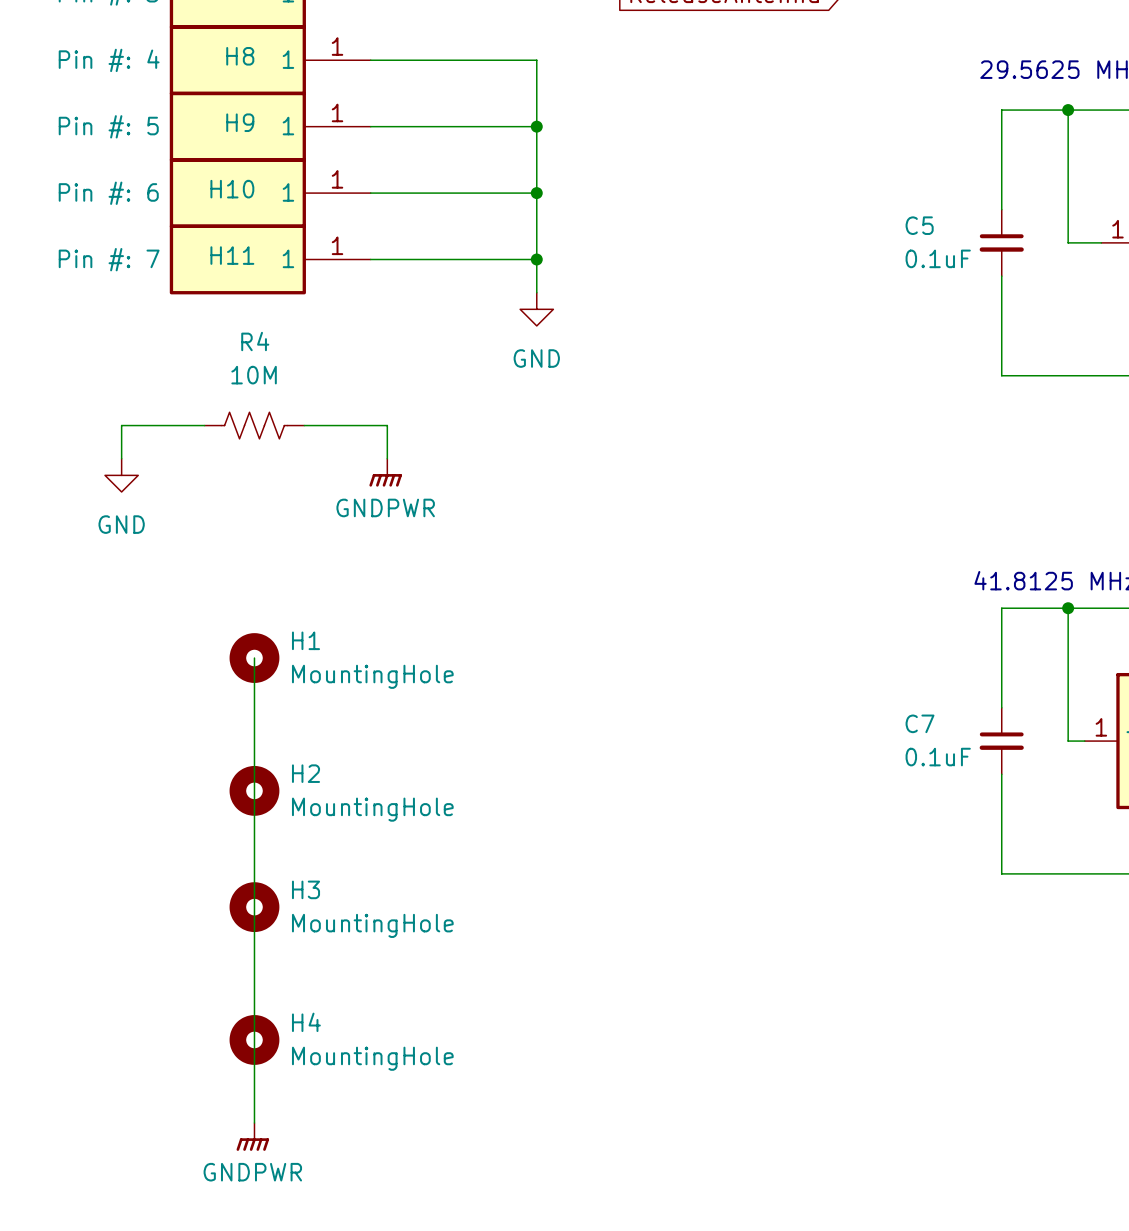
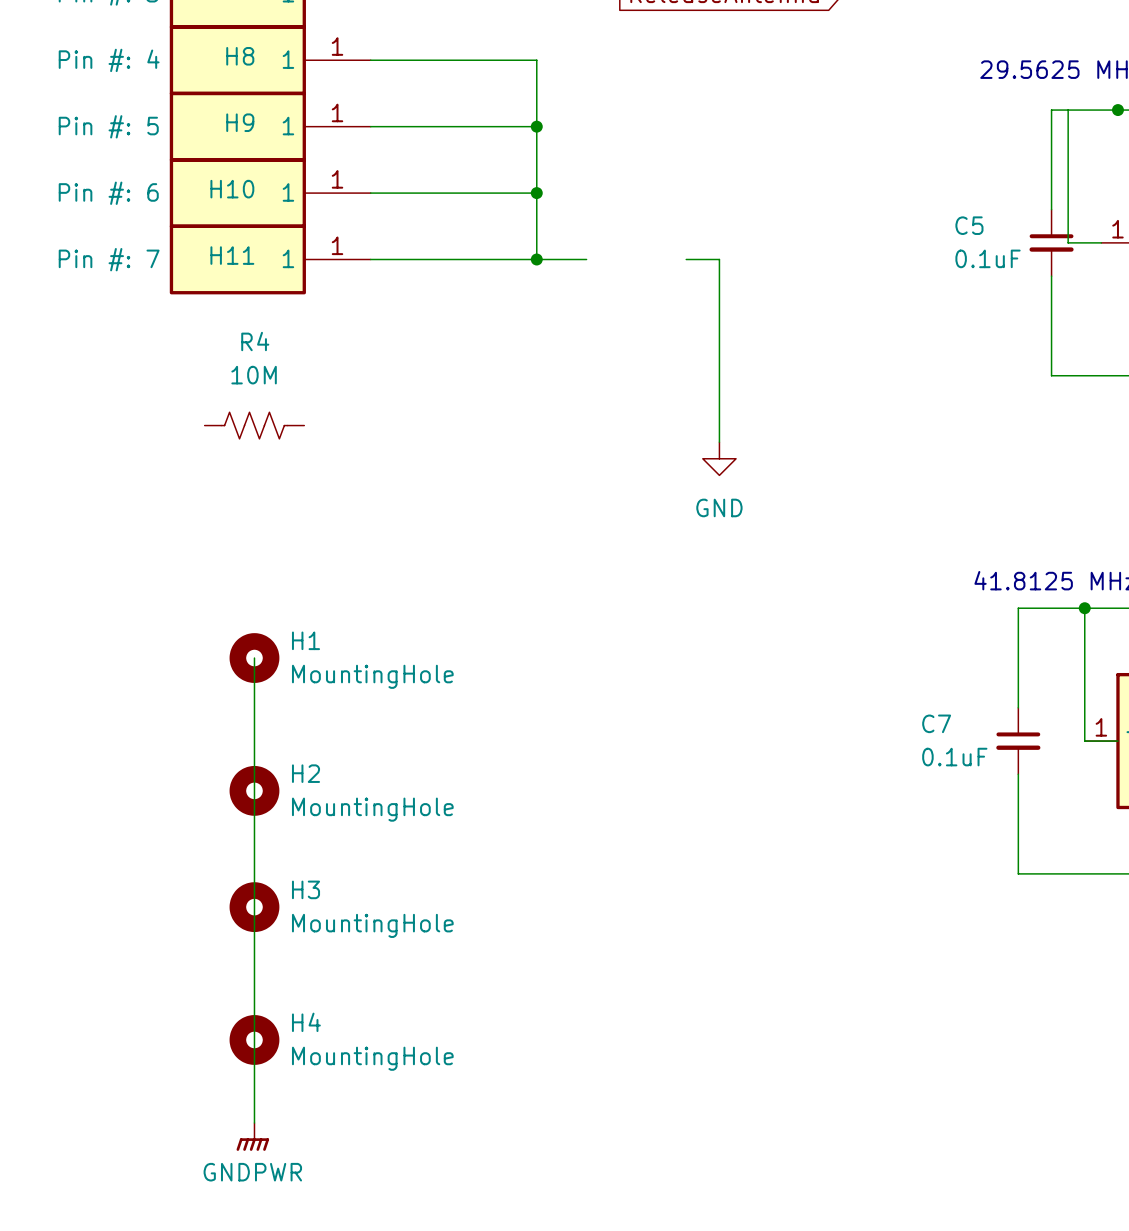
wire: (1051, 110) (1001, 110) (1001, 209) -> (1051, 110) (1051, 209)
junction position: (1068, 110) -> (1117, 110)
C5 position: (1001, 242) -> (1051, 242)
wire: (536, 259) (536, 292) -> (536, 259) (586, 259)
wire: none -> (686, 259) (719, 259) (719, 442)
wire: (1001, 276) (1001, 375) (1051, 375) -> (1051, 276) (1051, 375)
power symbol position: GND (536, 309) -> GND (719, 458)
wire: (204, 425) (121, 425) (121, 458) -> none
wire: (304, 425) (387, 425) (387, 458) -> none
power symbol: GNDPWR (385, 472) -> none
power symbol: GND (121, 475) -> none
wire: (1018, 608) (1001, 608) (1001, 707) -> (1018, 608) (1018, 707)
wire: (1068, 608) (1068, 741) (1084, 741) -> none
junction position: (1068, 608) -> (1084, 608)
wire: none -> (1084, 608) (1084, 741) (1117, 741)
C7 position: (1001, 741) -> (1018, 741)
wire: (1001, 774) (1001, 873) (1018, 873) -> (1018, 774) (1018, 873)

